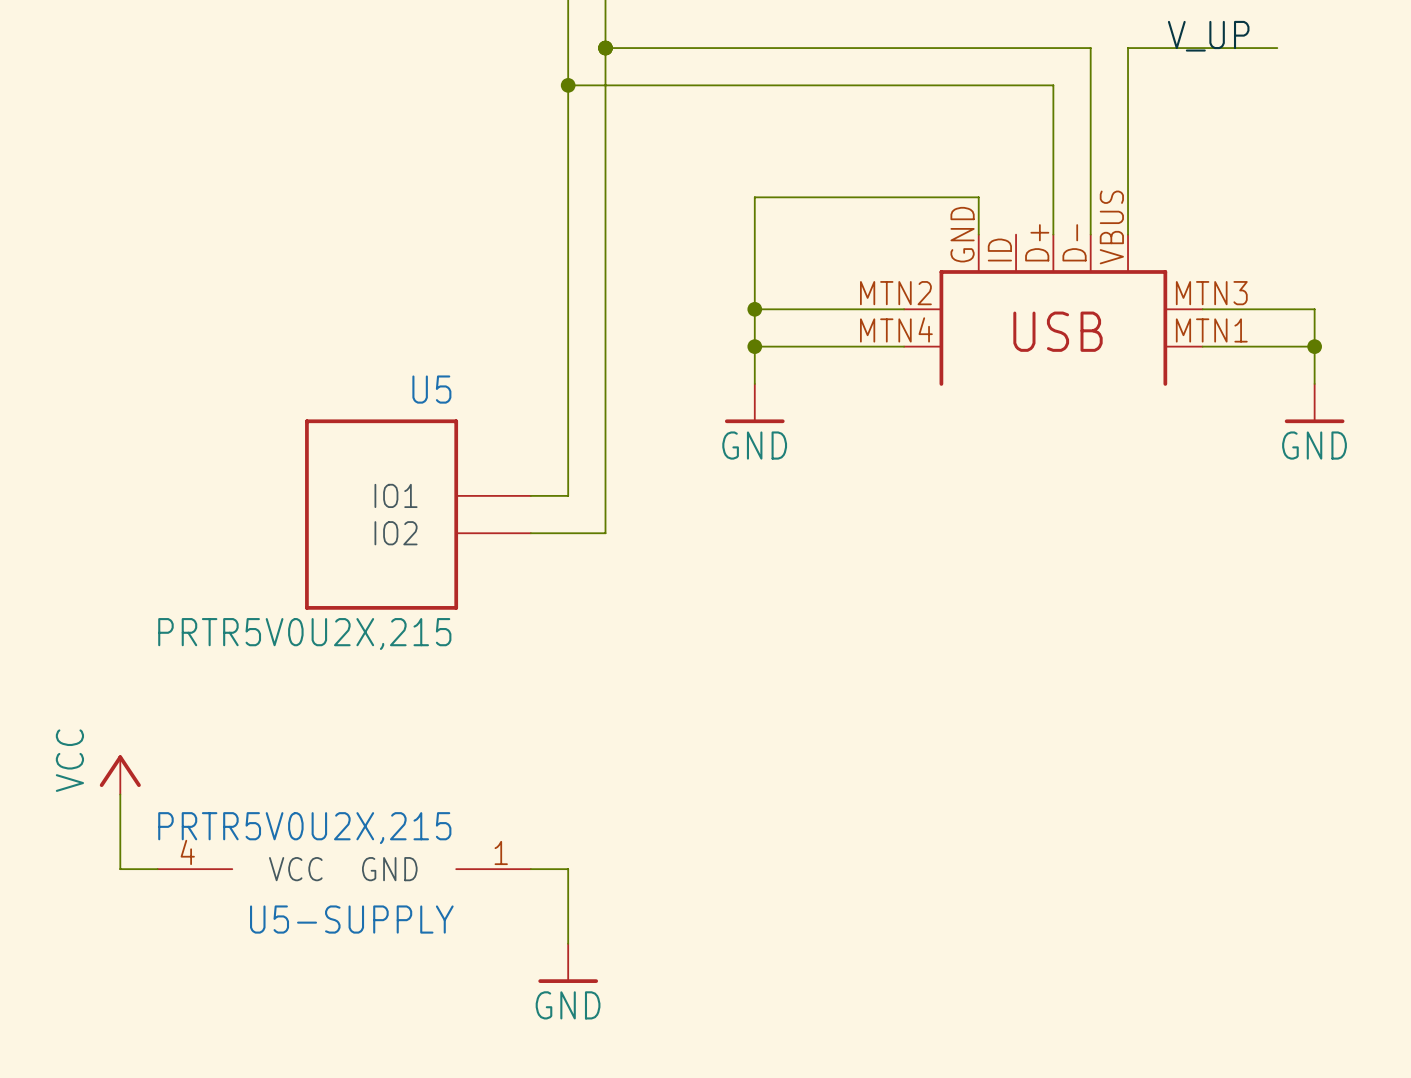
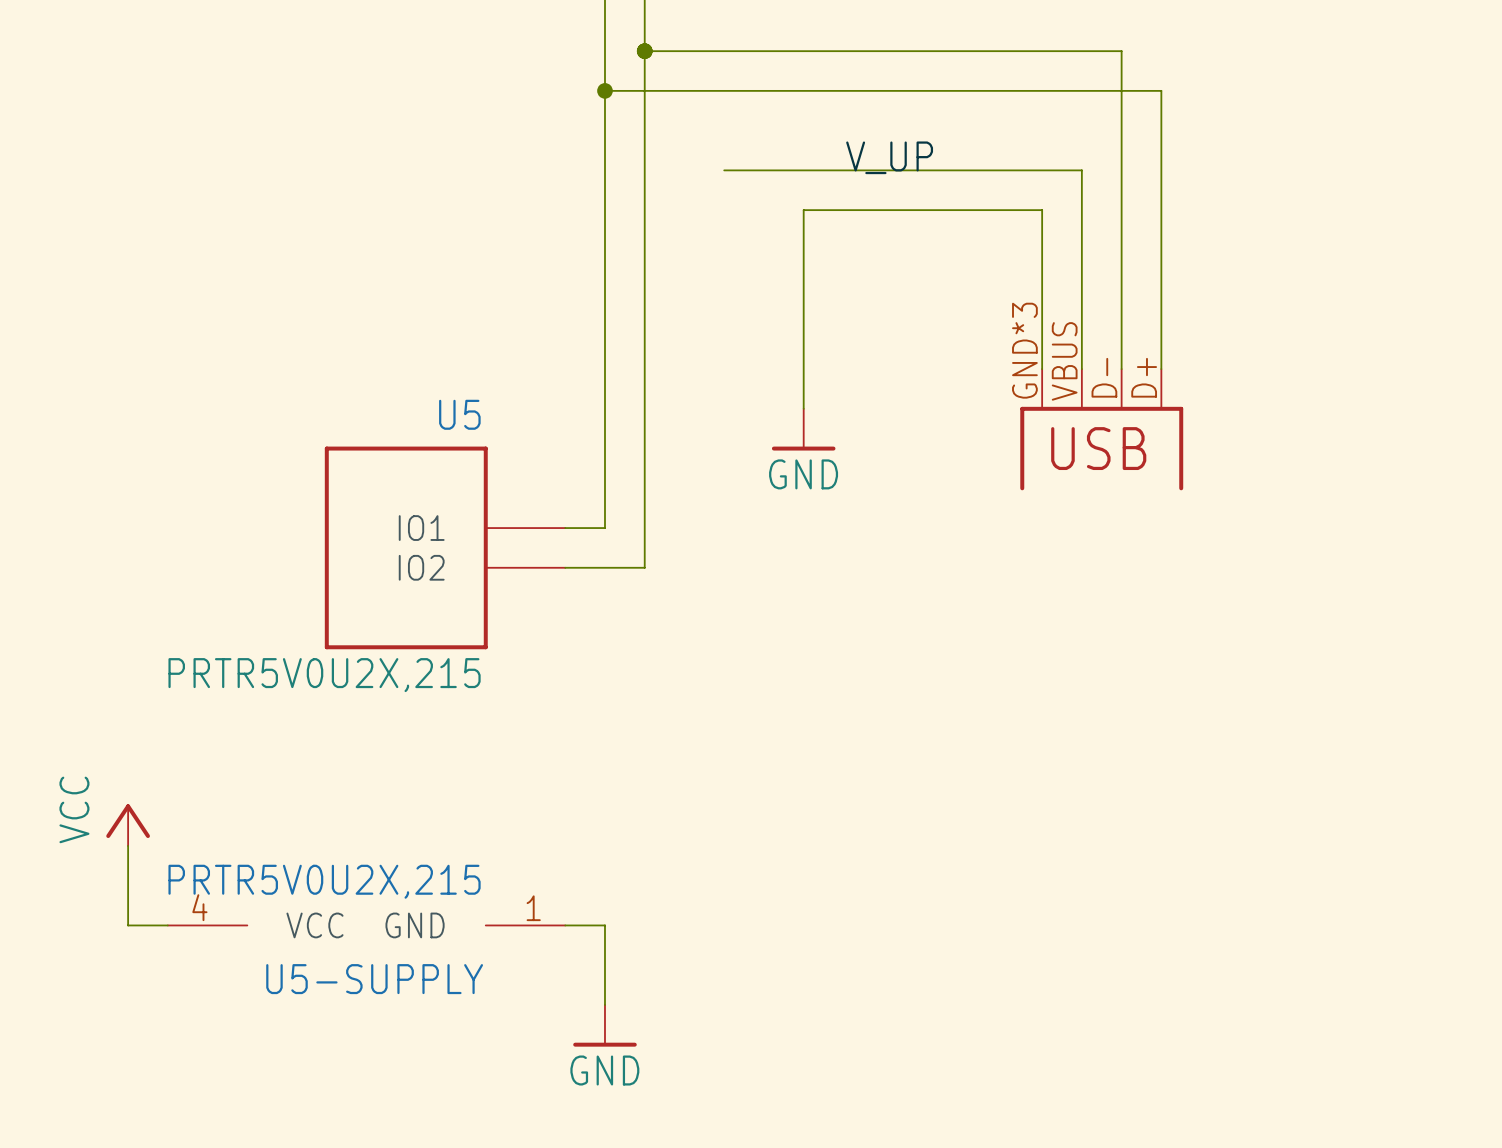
label: V_UP (1208, 36) -> none
wire: (1053, 48) (1090, 48) (1090, 85) -> (1121, 51) (1121, 90) (1161, 90)
wire: (1277, 48) (1128, 48) (1128, 234) -> none
label: none -> V_UP (889, 157)
wire: none -> (724, 170) (1081, 170) (1081, 369)
wire: none -> (1042, 249) (1042, 369)
wire: none -> (1121, 249) (1121, 369)
wire: none -> (1161, 249) (1161, 369)
wire: (754, 309) (904, 309) -> none
junction: (754, 309) -> none
wire: (1202, 309) (1314, 309) (1314, 383) -> none
part: (1053, 310) -> none
wire: (754, 346) (904, 346) -> none
junction: (754, 346) -> none
wire: (1202, 346) (1314, 346) -> none
junction: (1314, 346) -> none
part: none -> (1101, 429)
power symbol: GND (1314, 403) -> none

